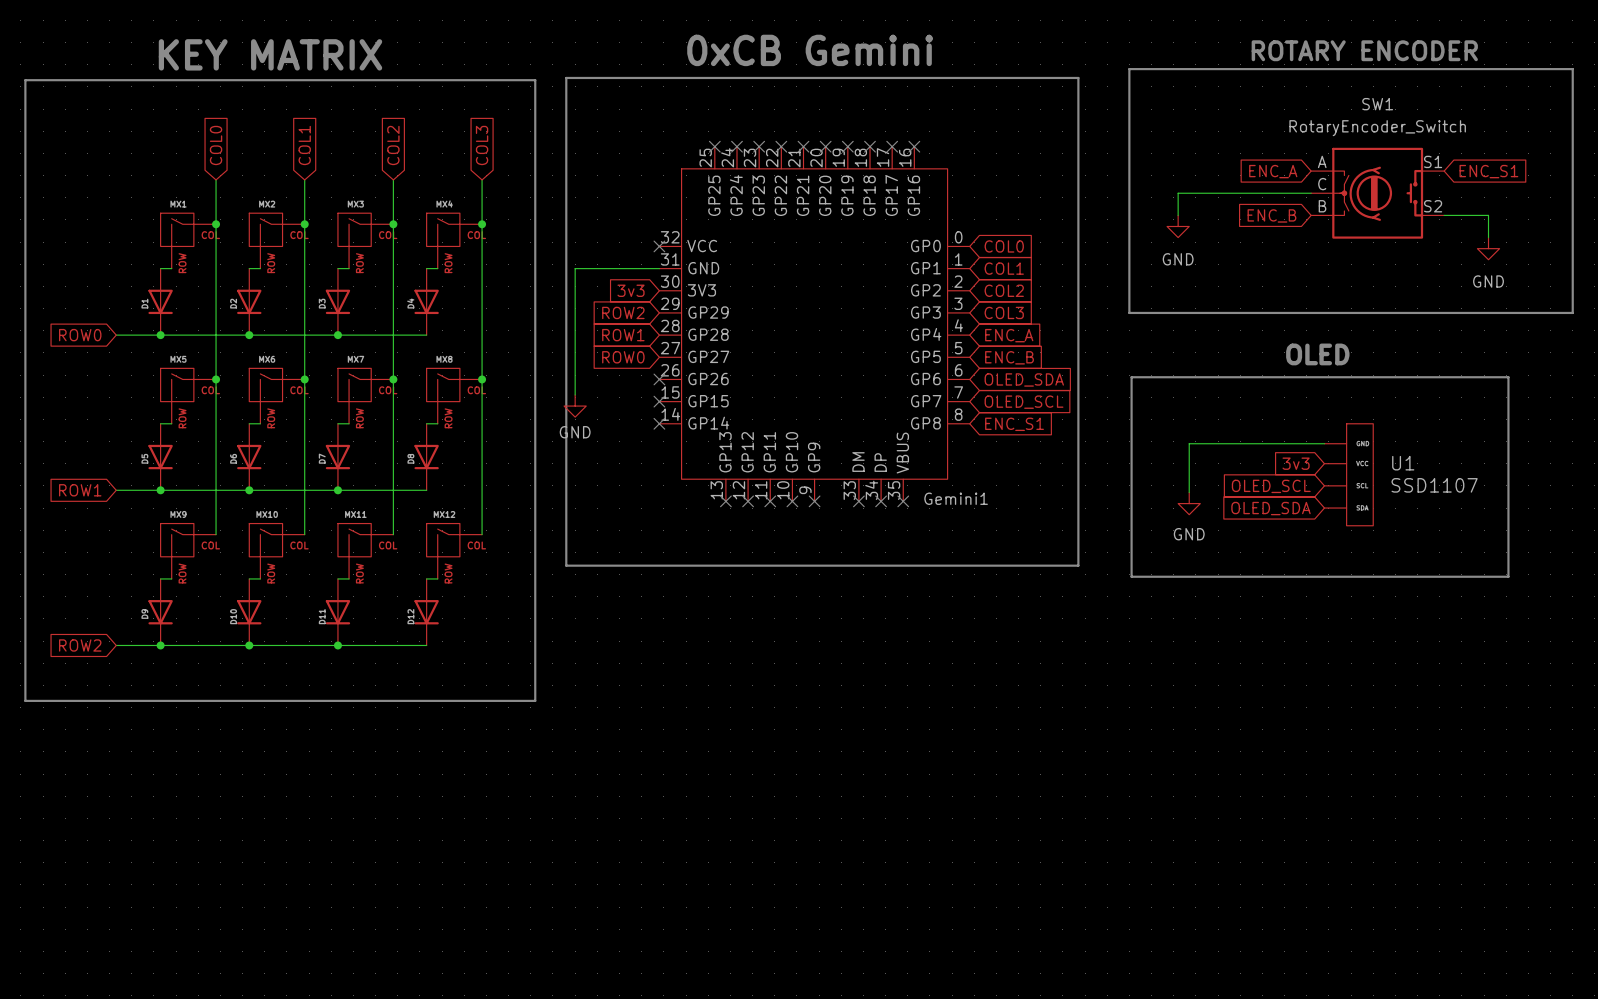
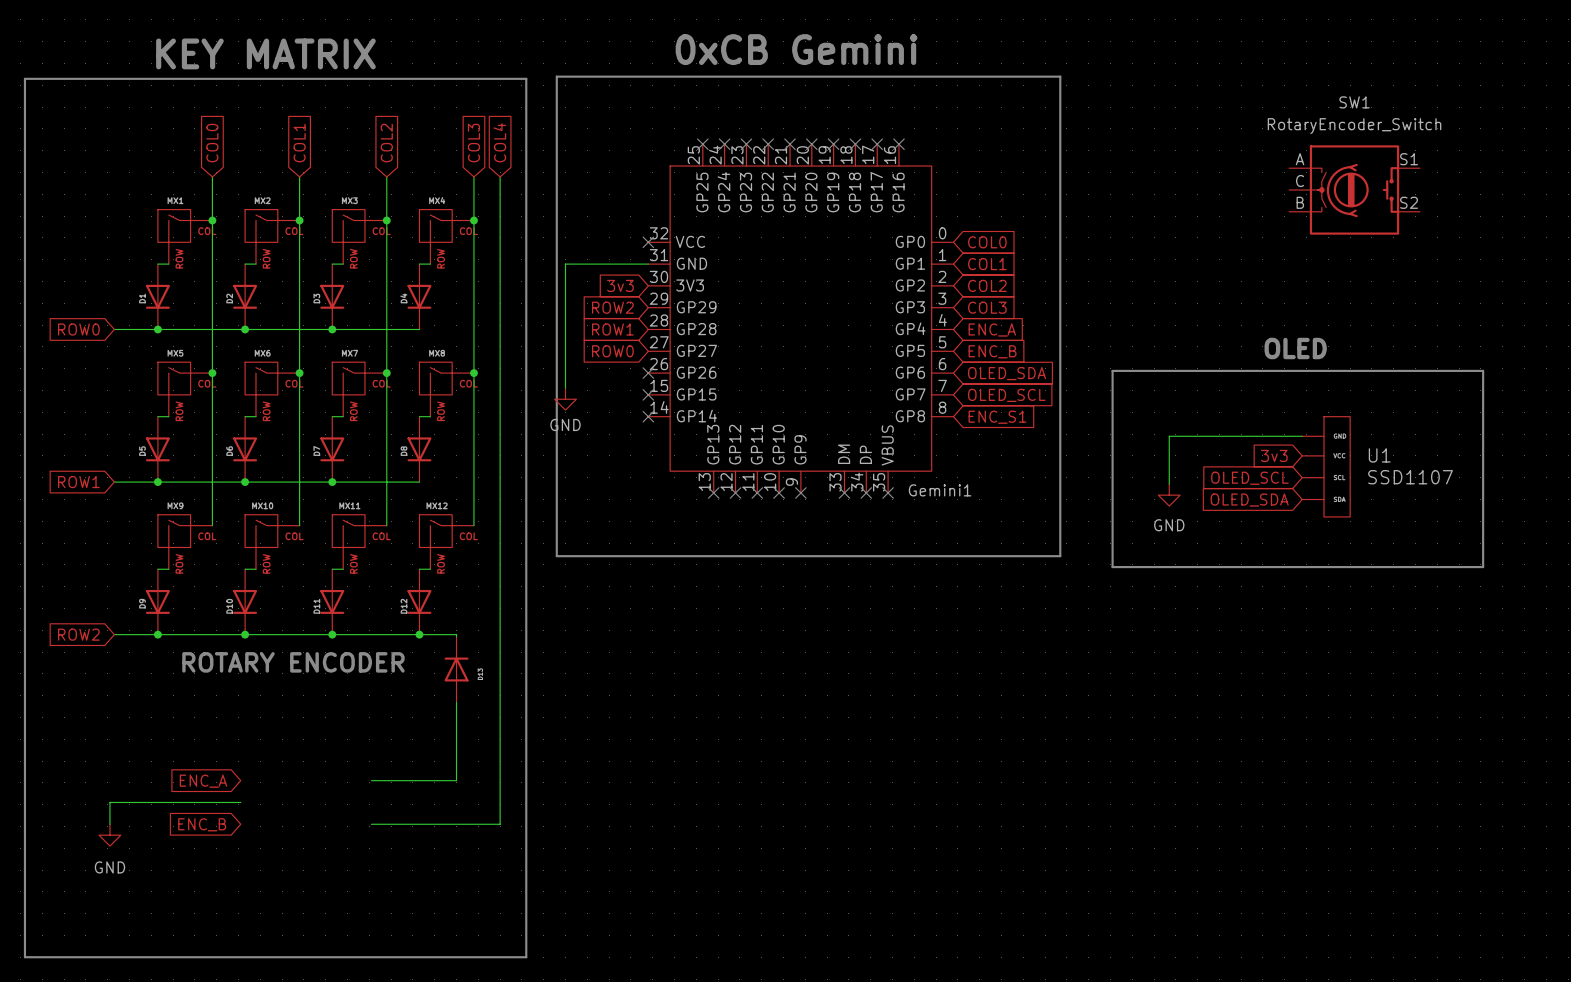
text: ROTARY ENCODER (1364, 50) -> none
line: (1129, 69) (1572, 69) (1572, 312) (1129, 312) (1129, 69) -> none
global label: none -> COL4 (499, 142)
global label: ENC_A (1273, 171) -> none
global label: ENC_S1 (1488, 171) -> none
wire: none -> (500, 176) (500, 824) (371, 824)
wire: (1311, 193) (1178, 193) (1178, 215) -> none
global label: ENC_B (1271, 215) -> none
wire: (1444, 215) (1488, 215) (1488, 237) -> none
power symbol: GND (1178, 226) -> none
power symbol: GND (1488, 248) -> none
wire: none -> (419, 634) (456, 634) (456, 636)
junction: none -> (419, 634)
text: none -> ROTARY ENCODER (293, 662)
part: none -> (456, 669)
line: (25, 700) (535, 700) -> (24, 689) (24, 957) (526, 957) (526, 689)
wire: none -> (456, 702) (456, 780) (371, 780)
global label: none -> ENC_A (203, 781)
wire: none -> (240, 802) (109, 802) (109, 824)
global label: none -> ENC_B (202, 824)
power symbol: none -> GND (109, 835)

